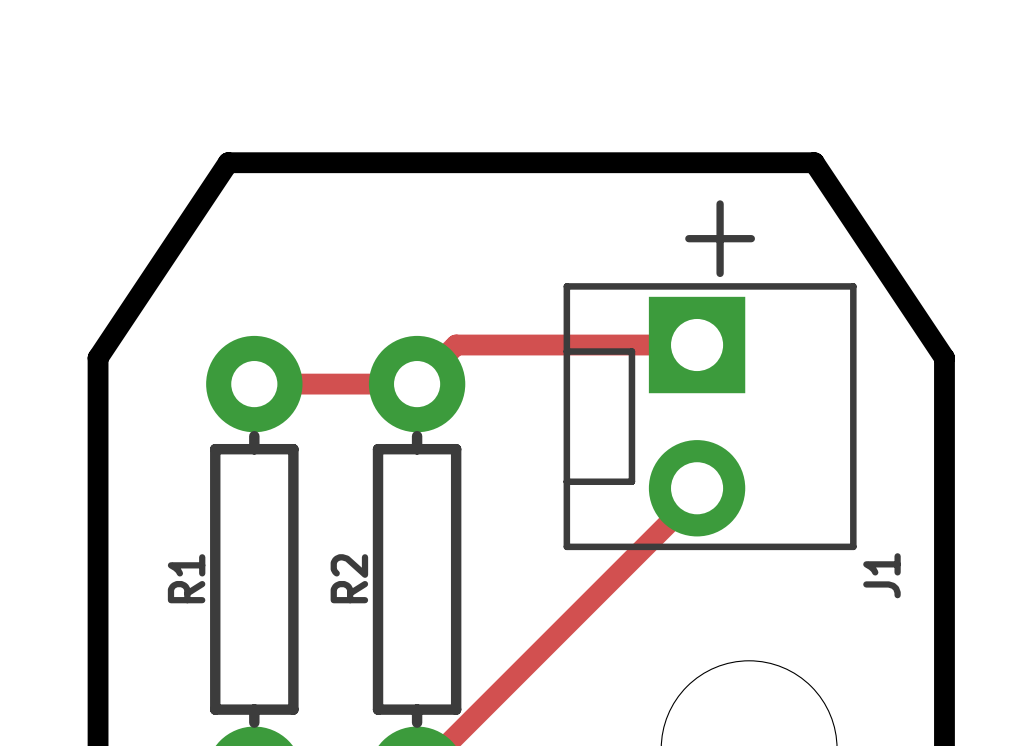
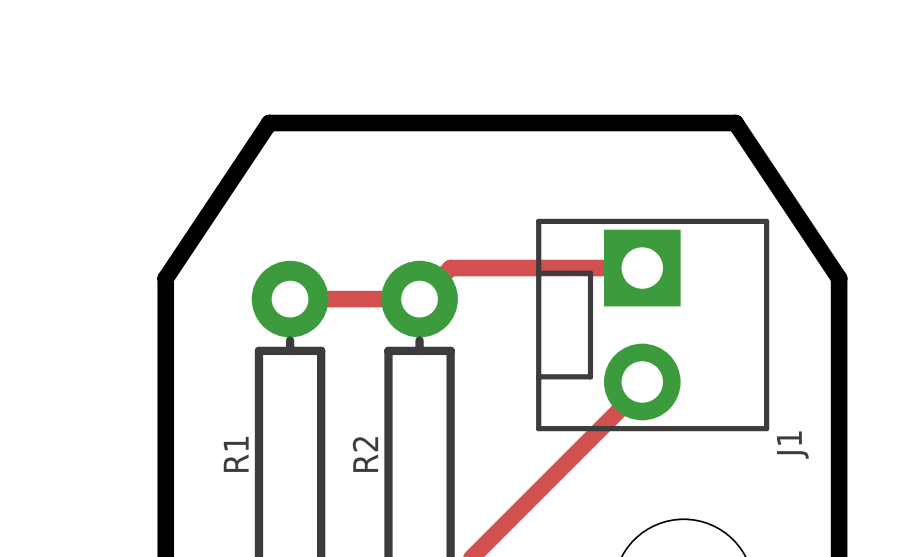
text: + (720, 238) -> none

